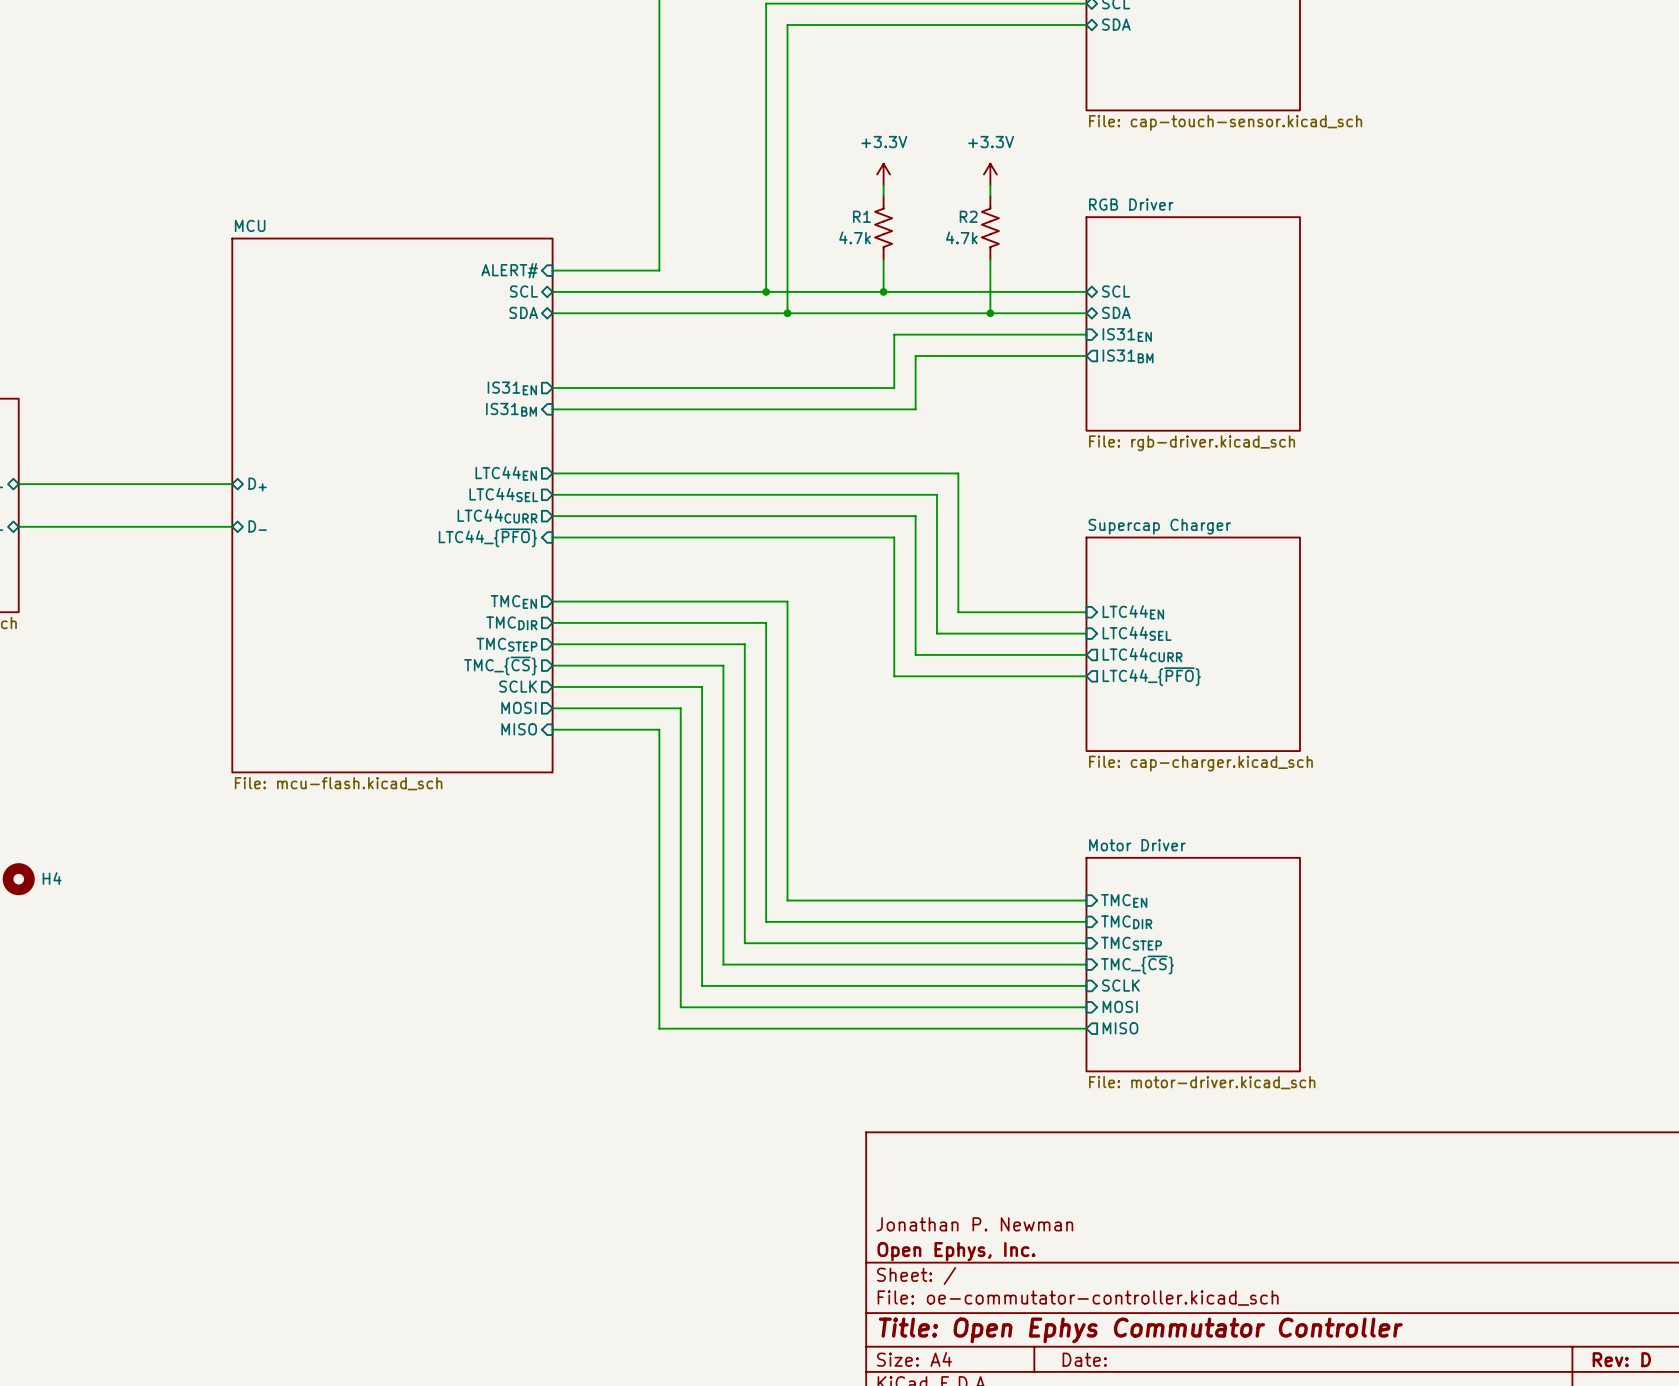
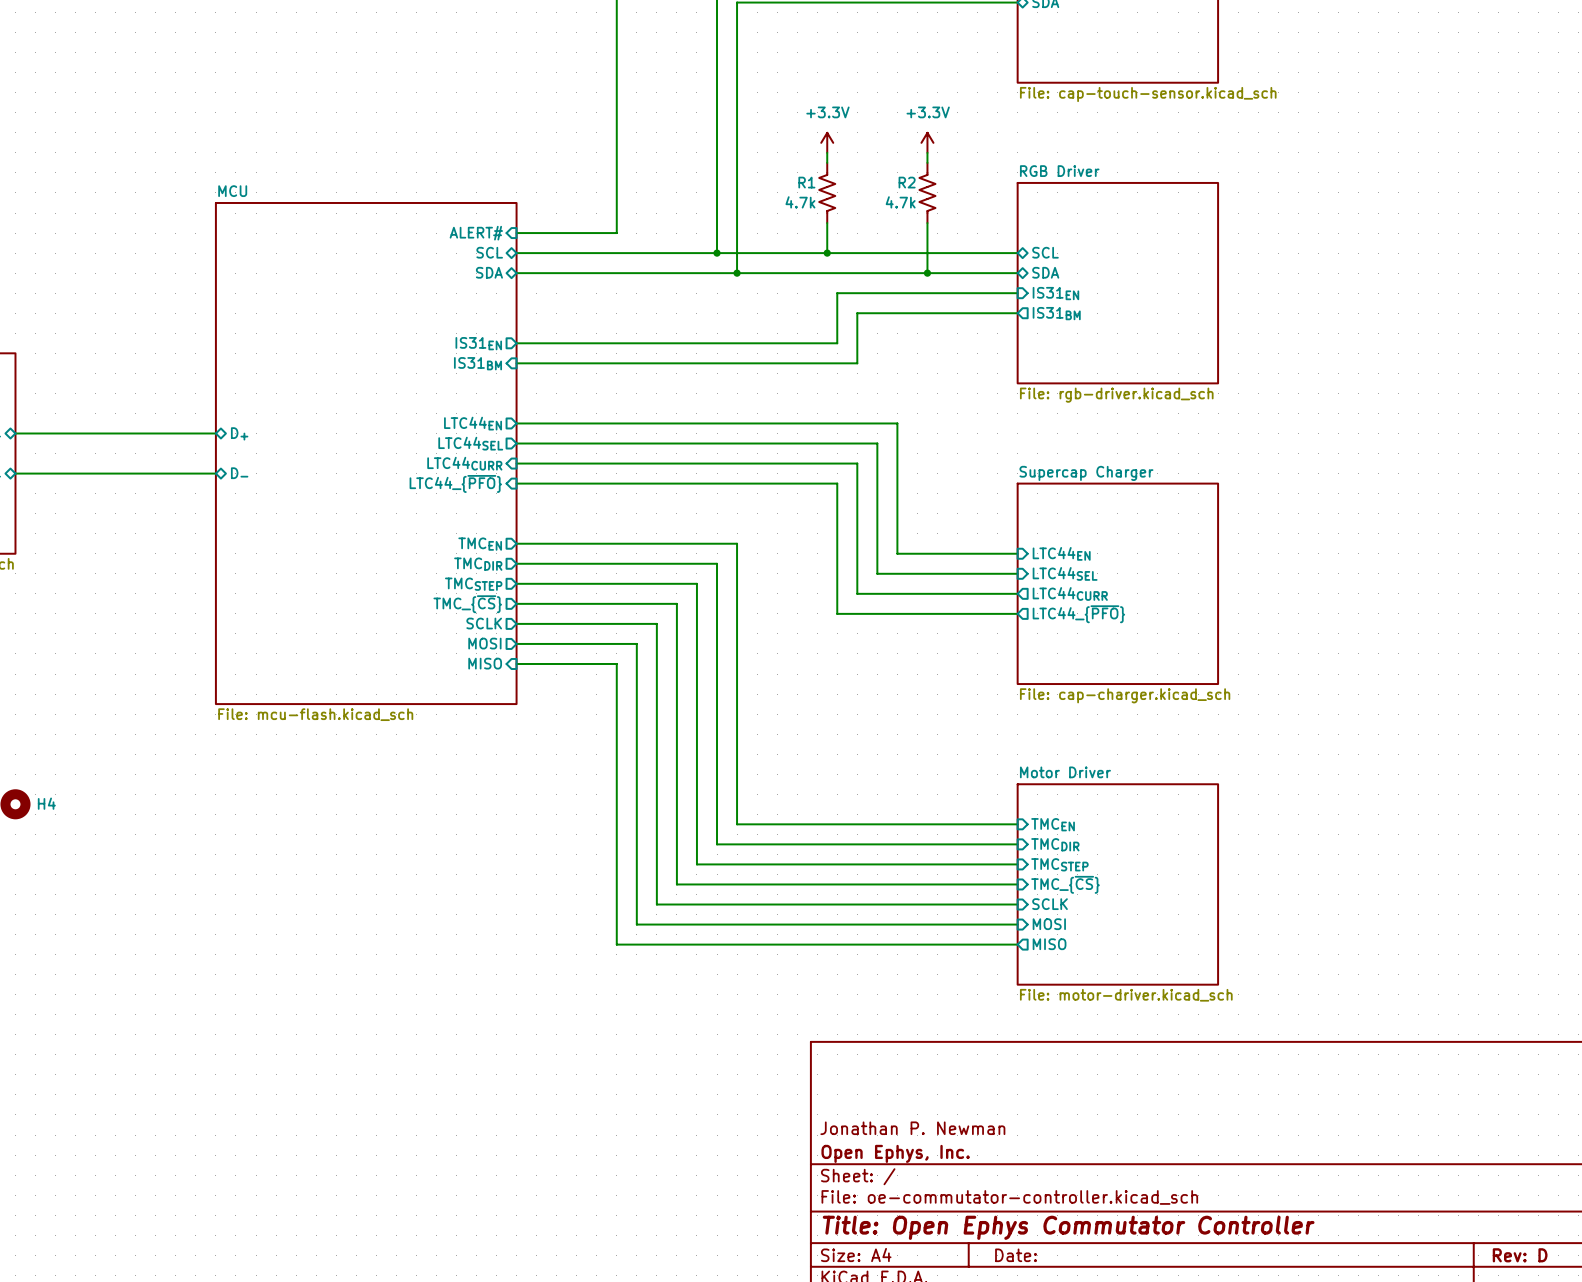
sheet pin shape: output (497, 516) -> input (464, 463)

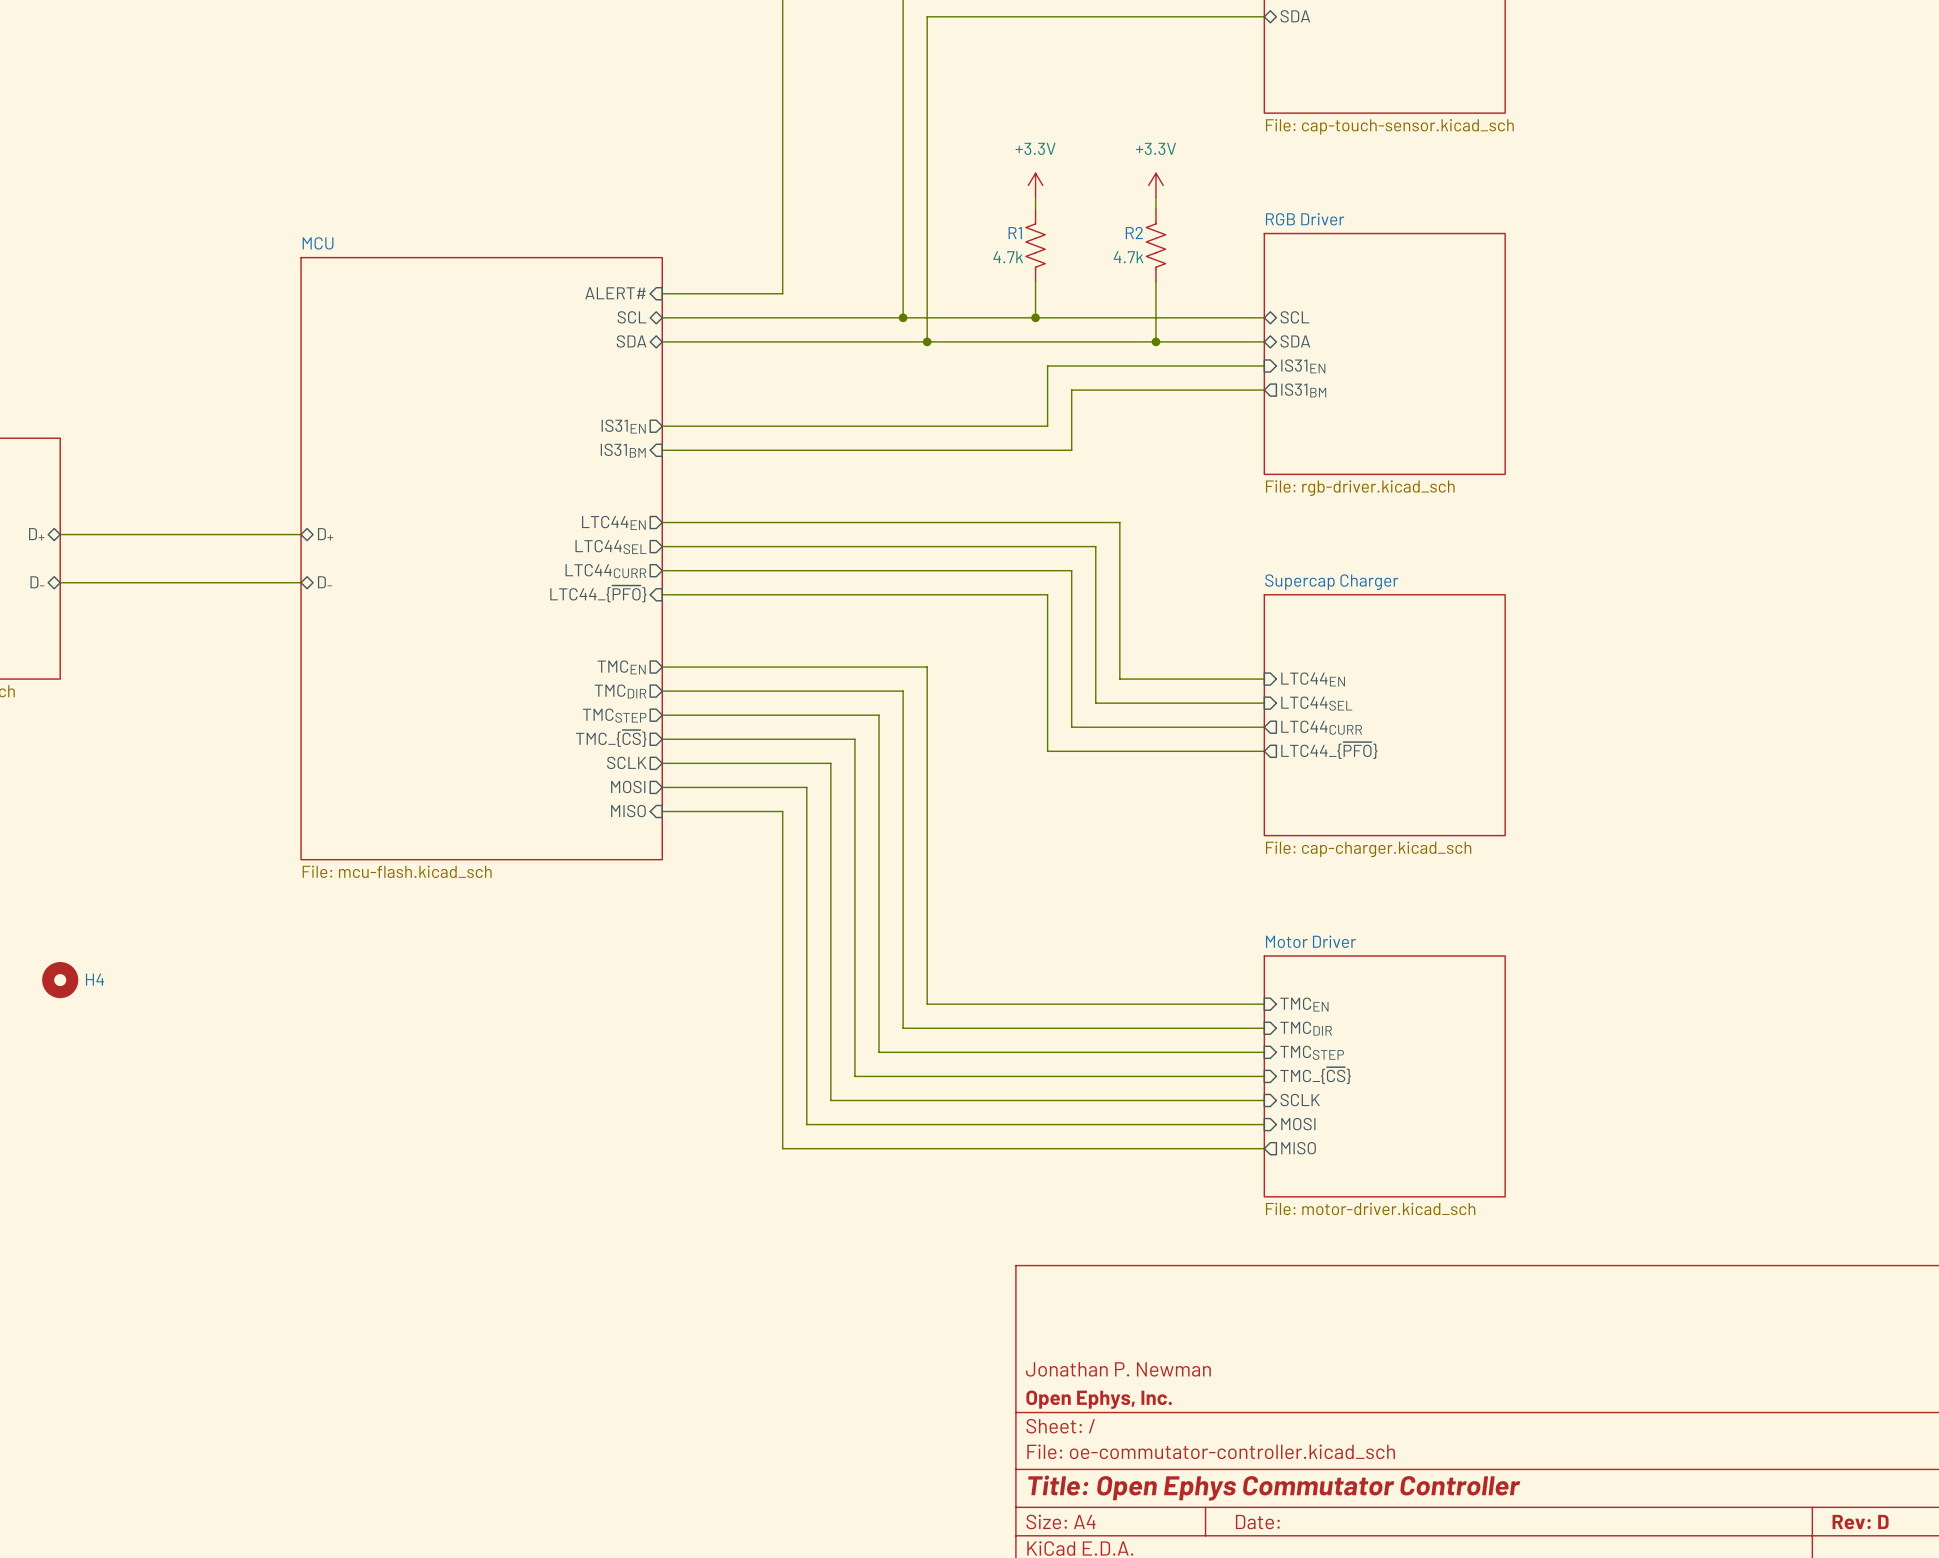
sheet pin shape: input (464, 463) -> output (605, 571)

